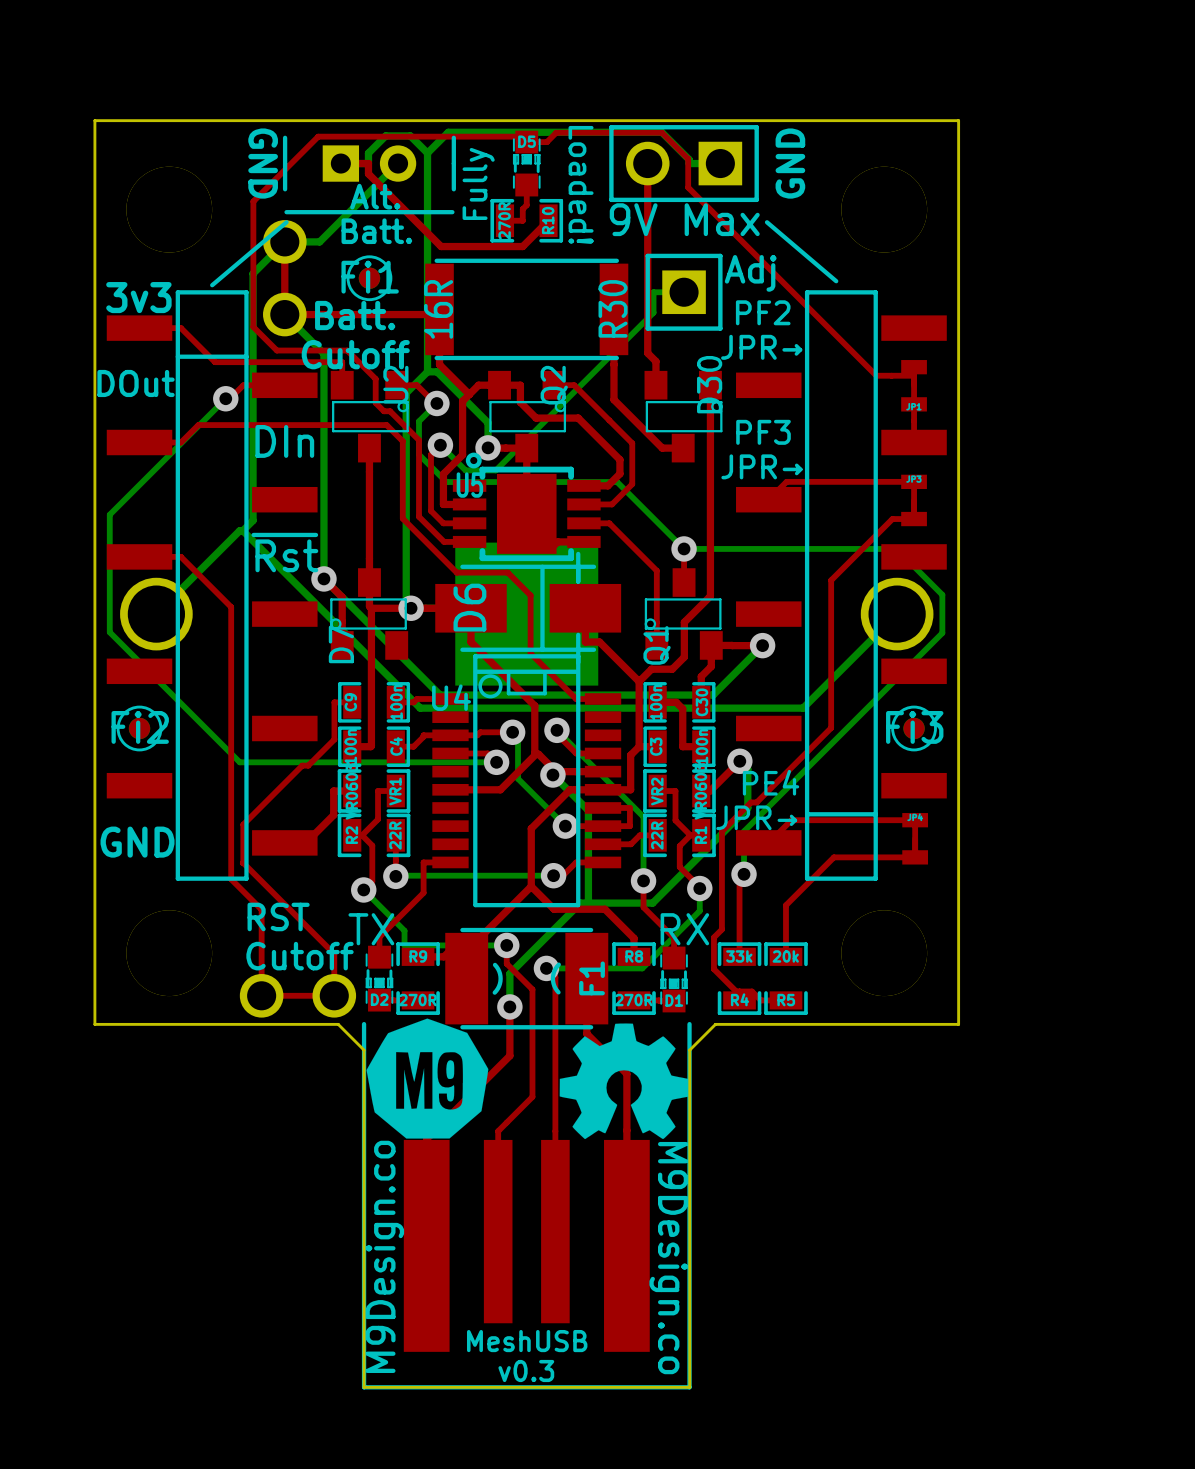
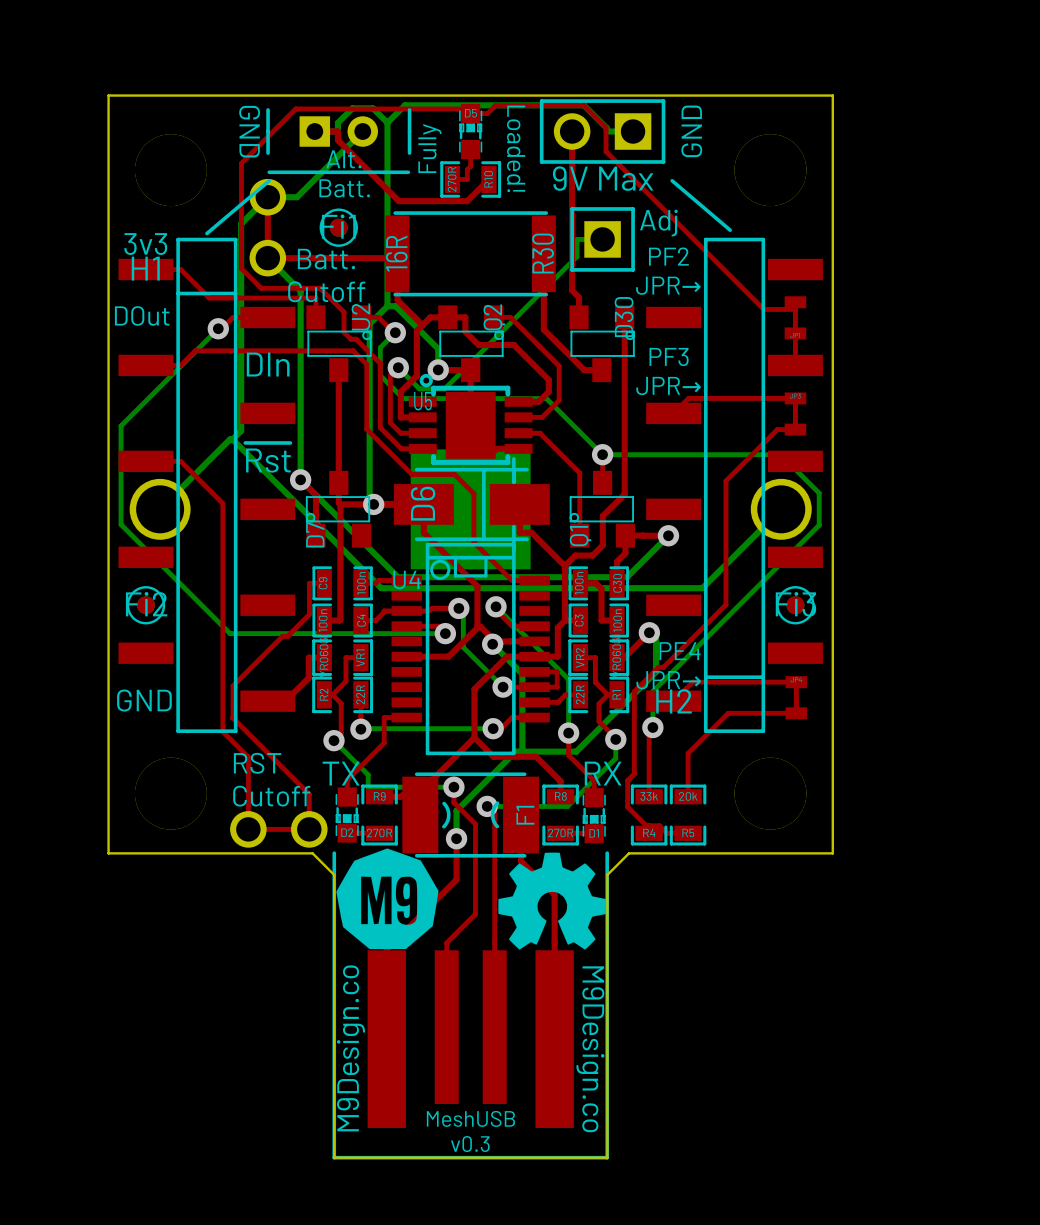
H1 name: none -> H1 (145, 268)
H2 name: none -> H2 (674, 701)

